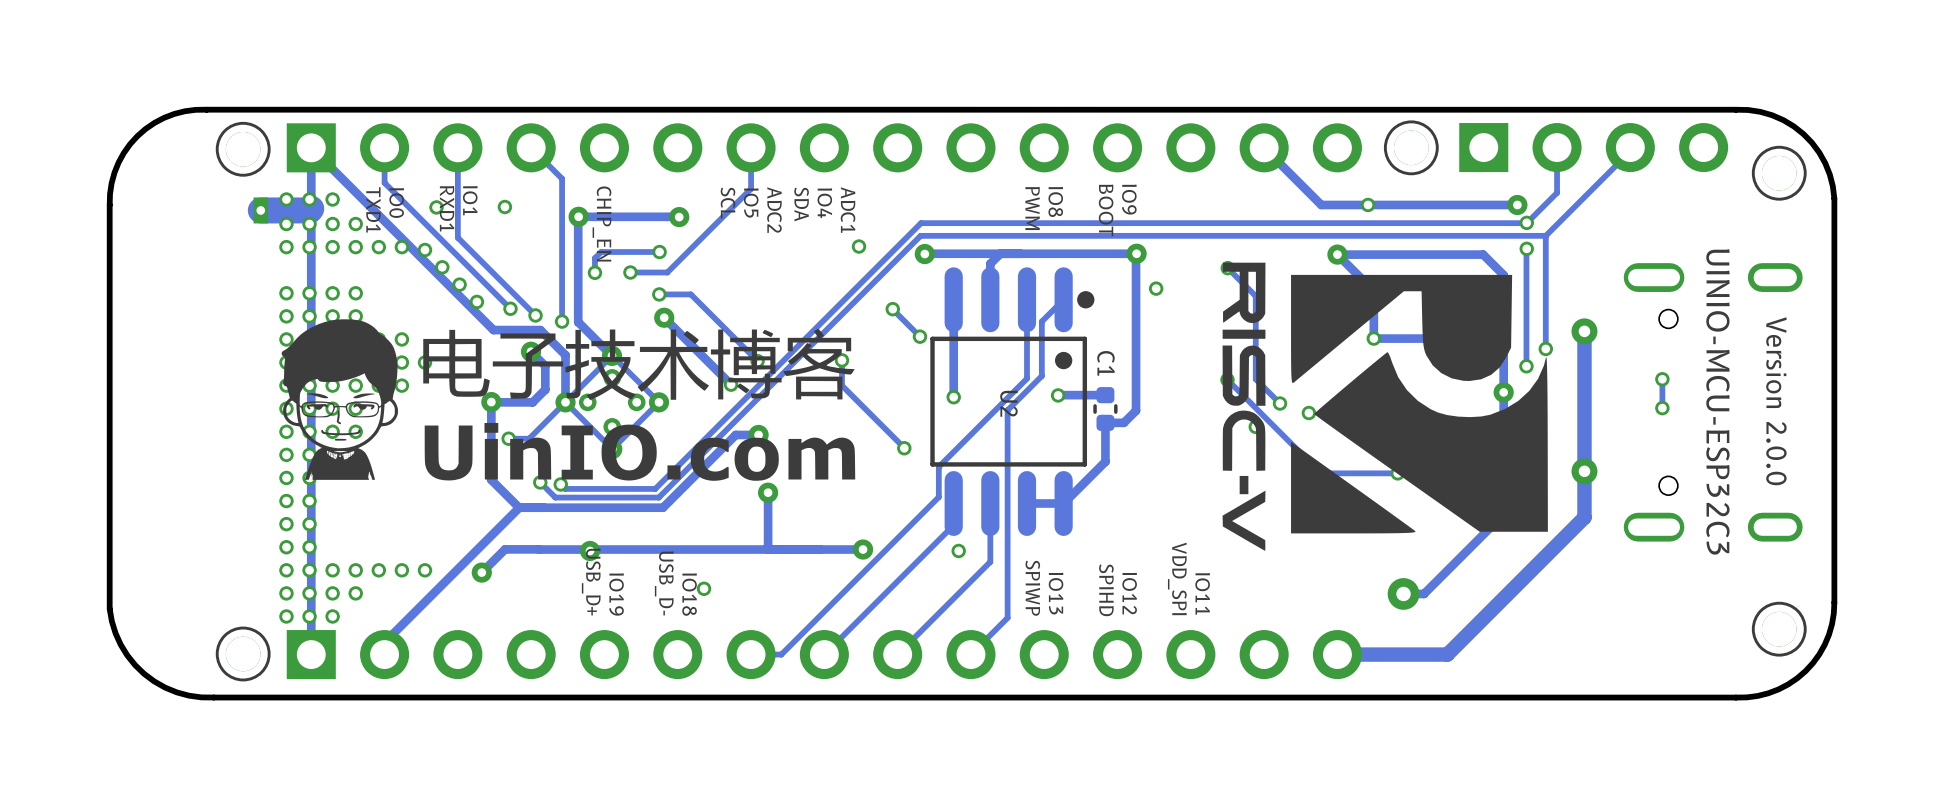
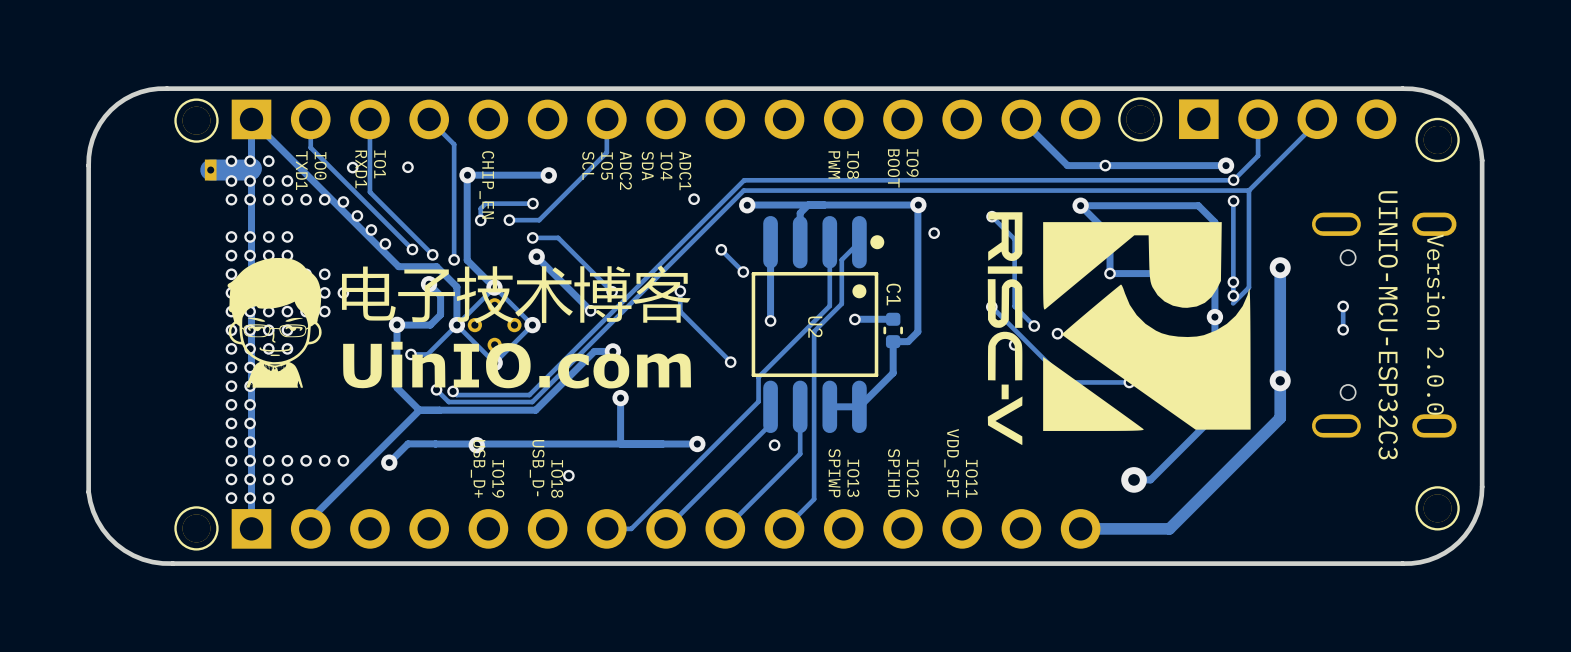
track: none -> (1248, 281) (1248, 287) (1233, 303)
via position: (1545, 348) -> (1233, 282)

